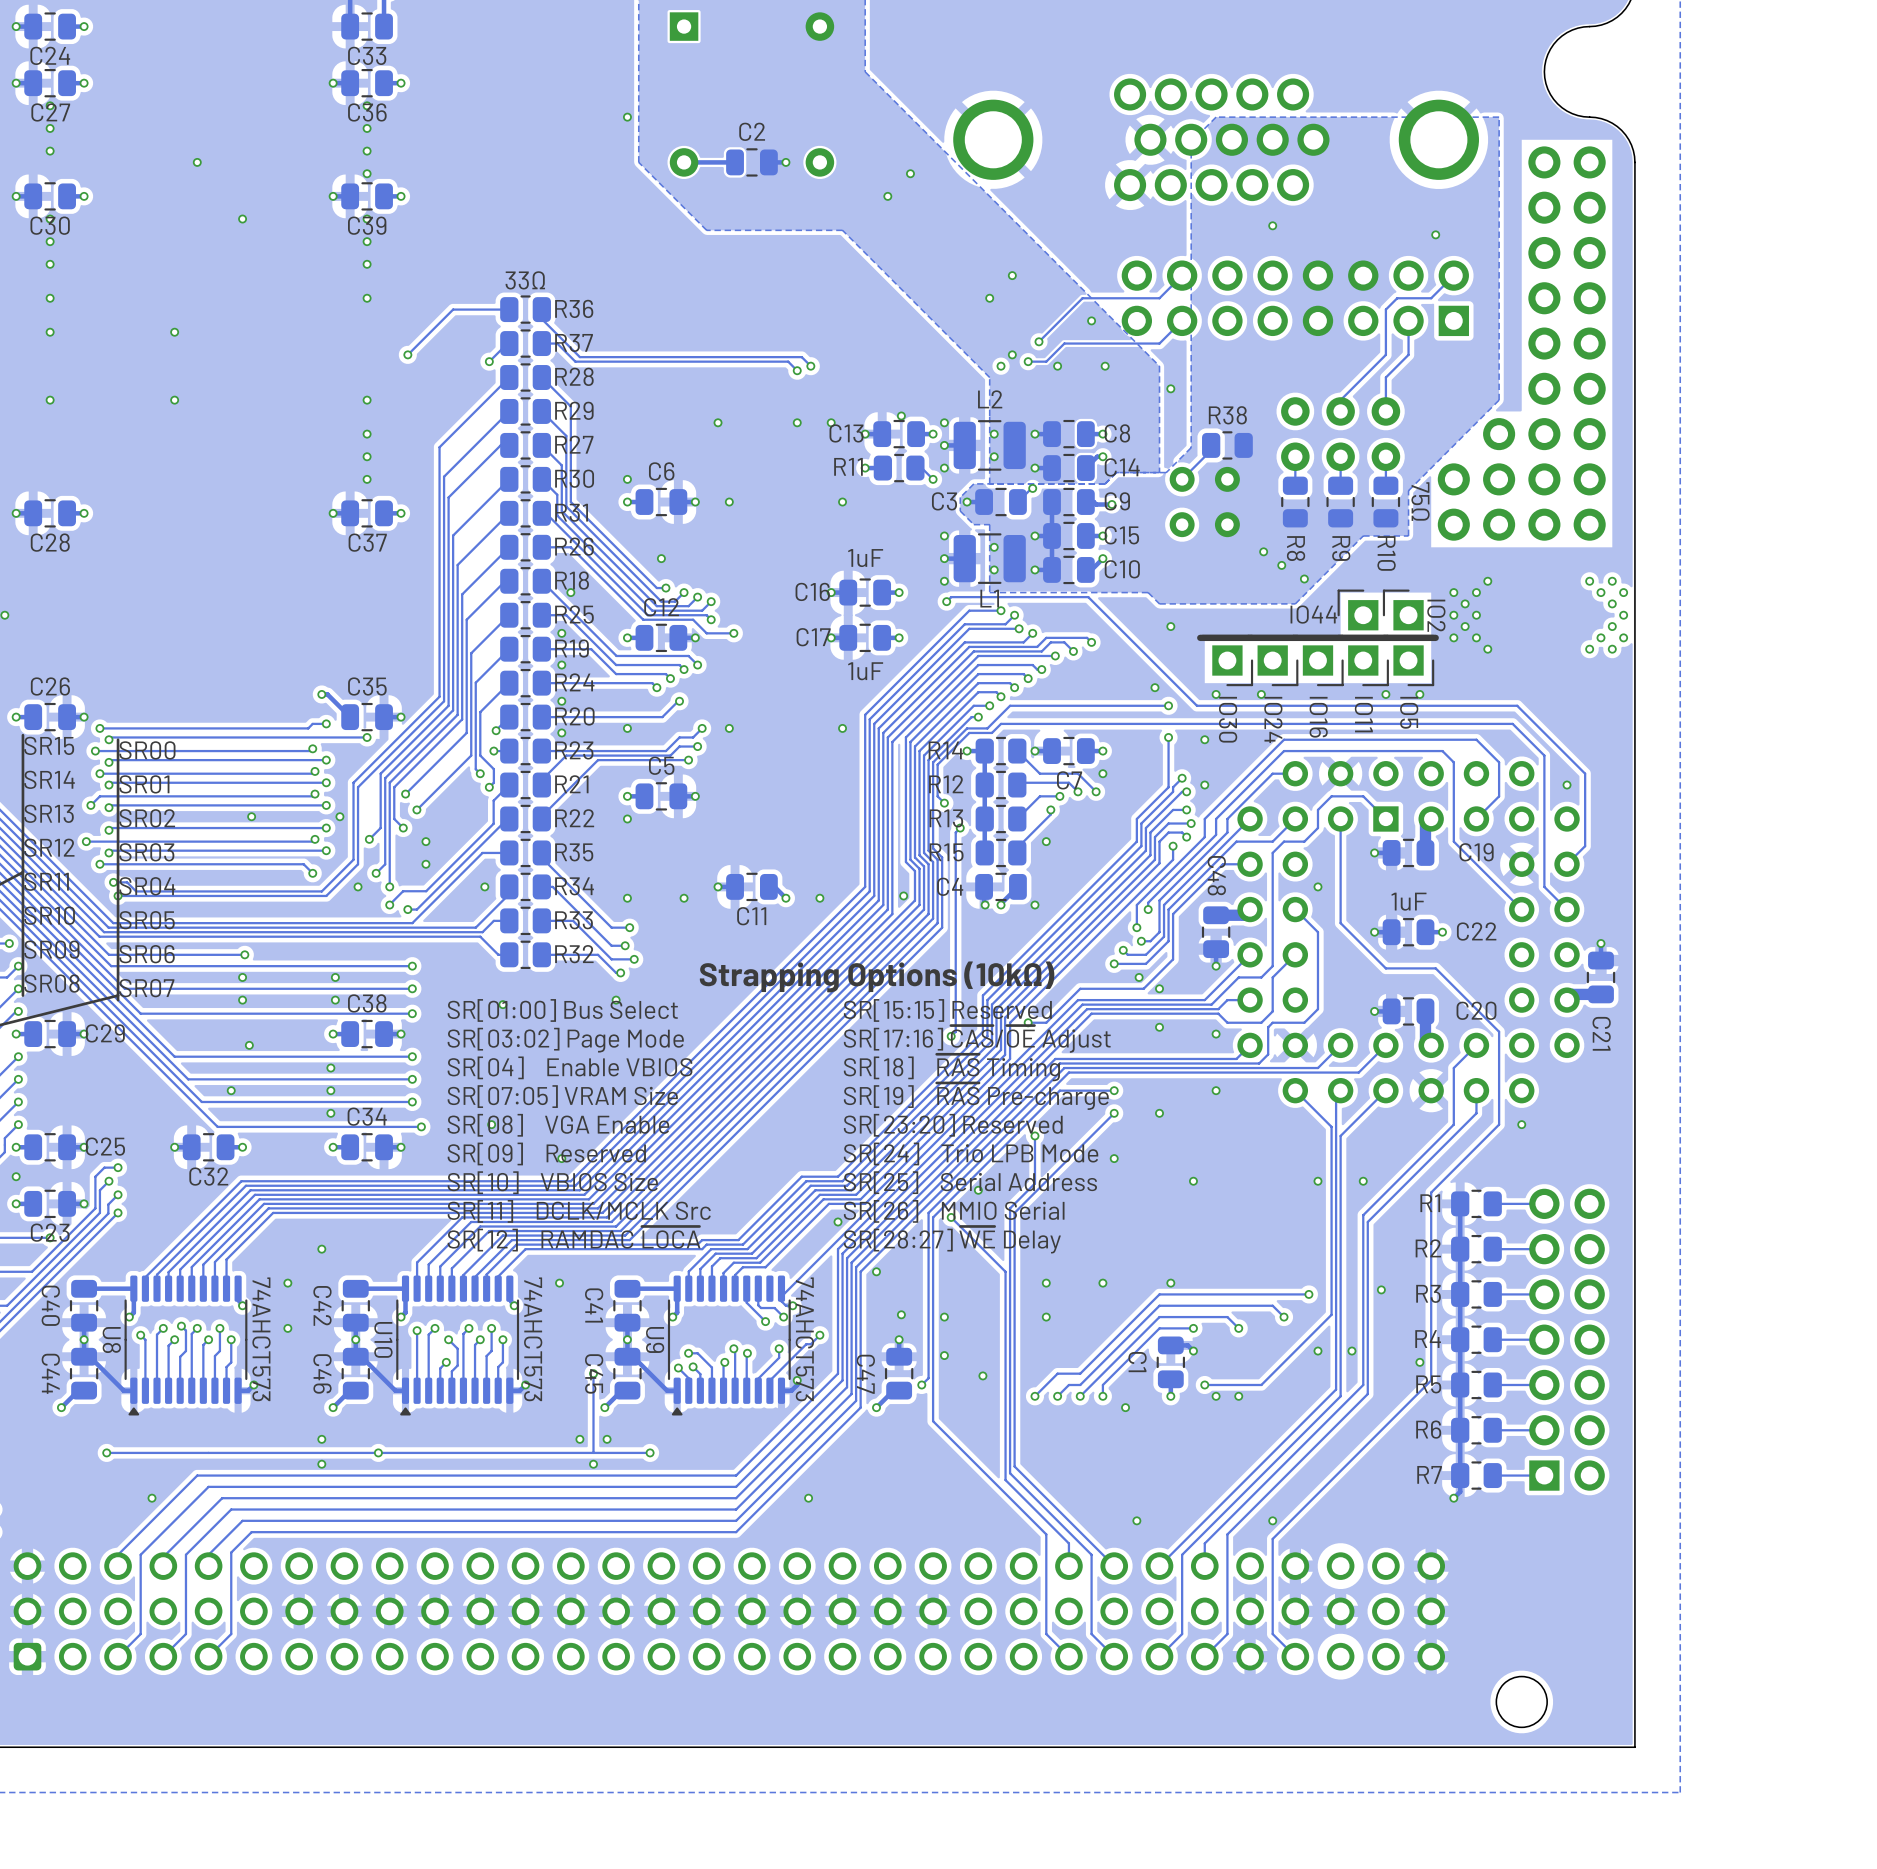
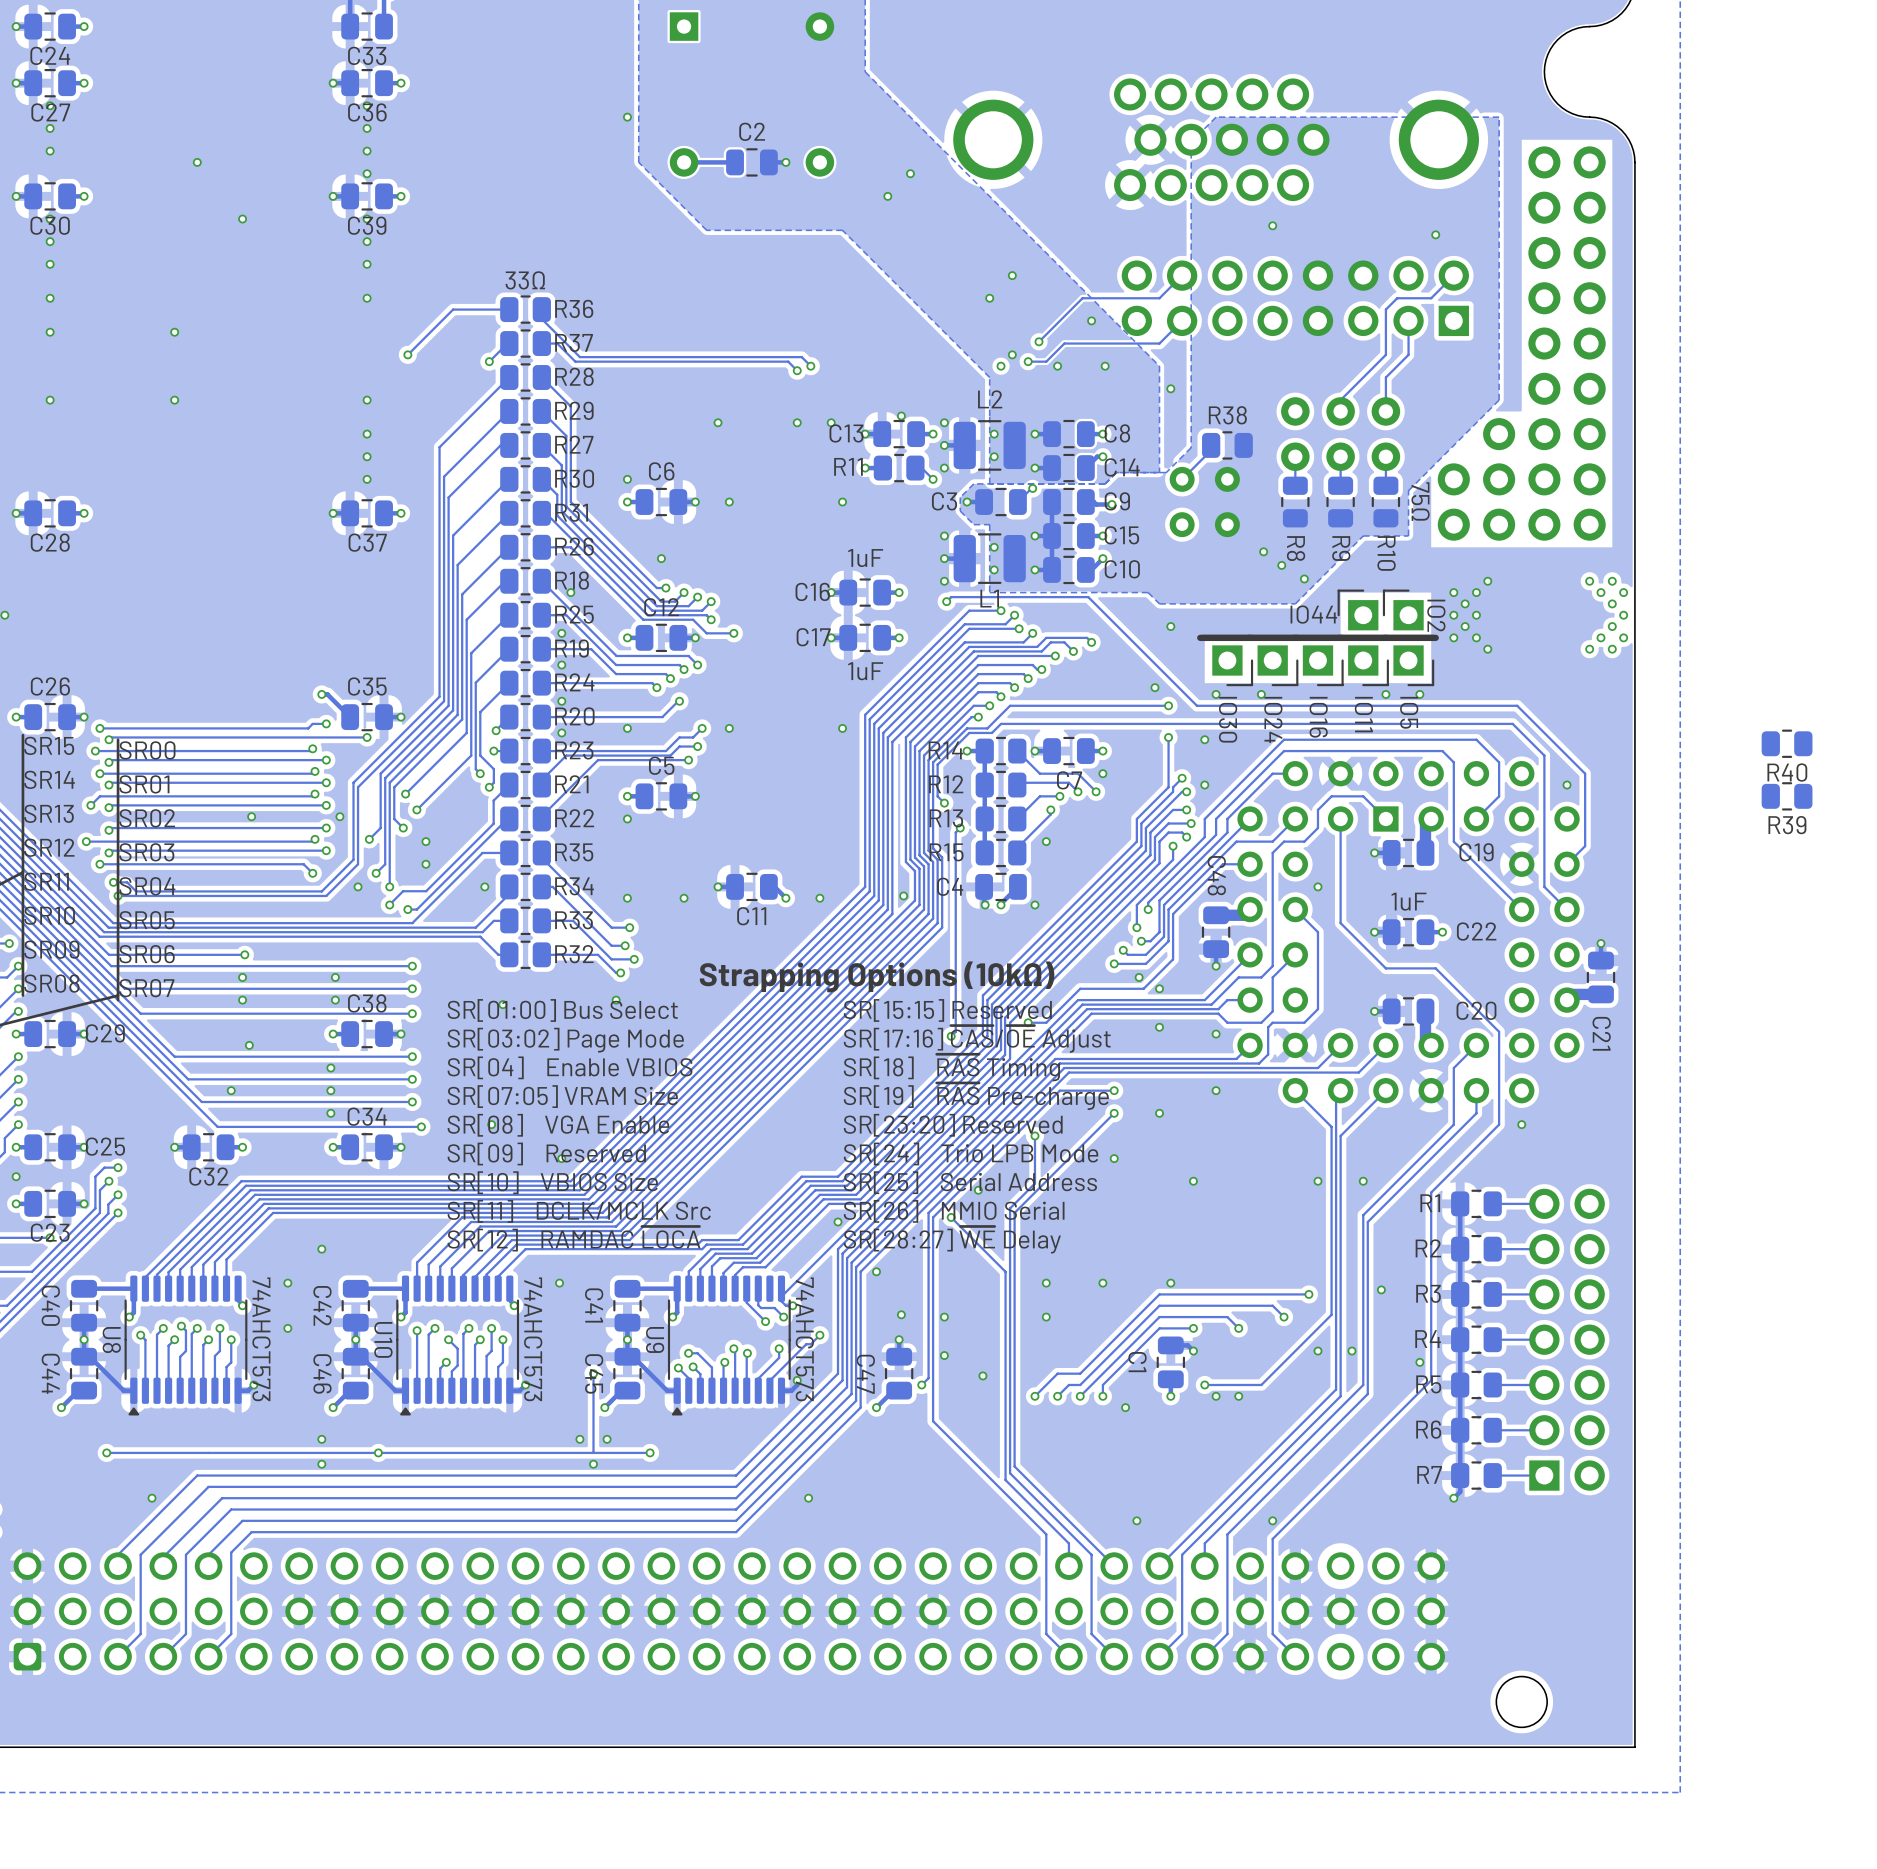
R40: none -> (1787, 743)
R39: none -> (1787, 796)

